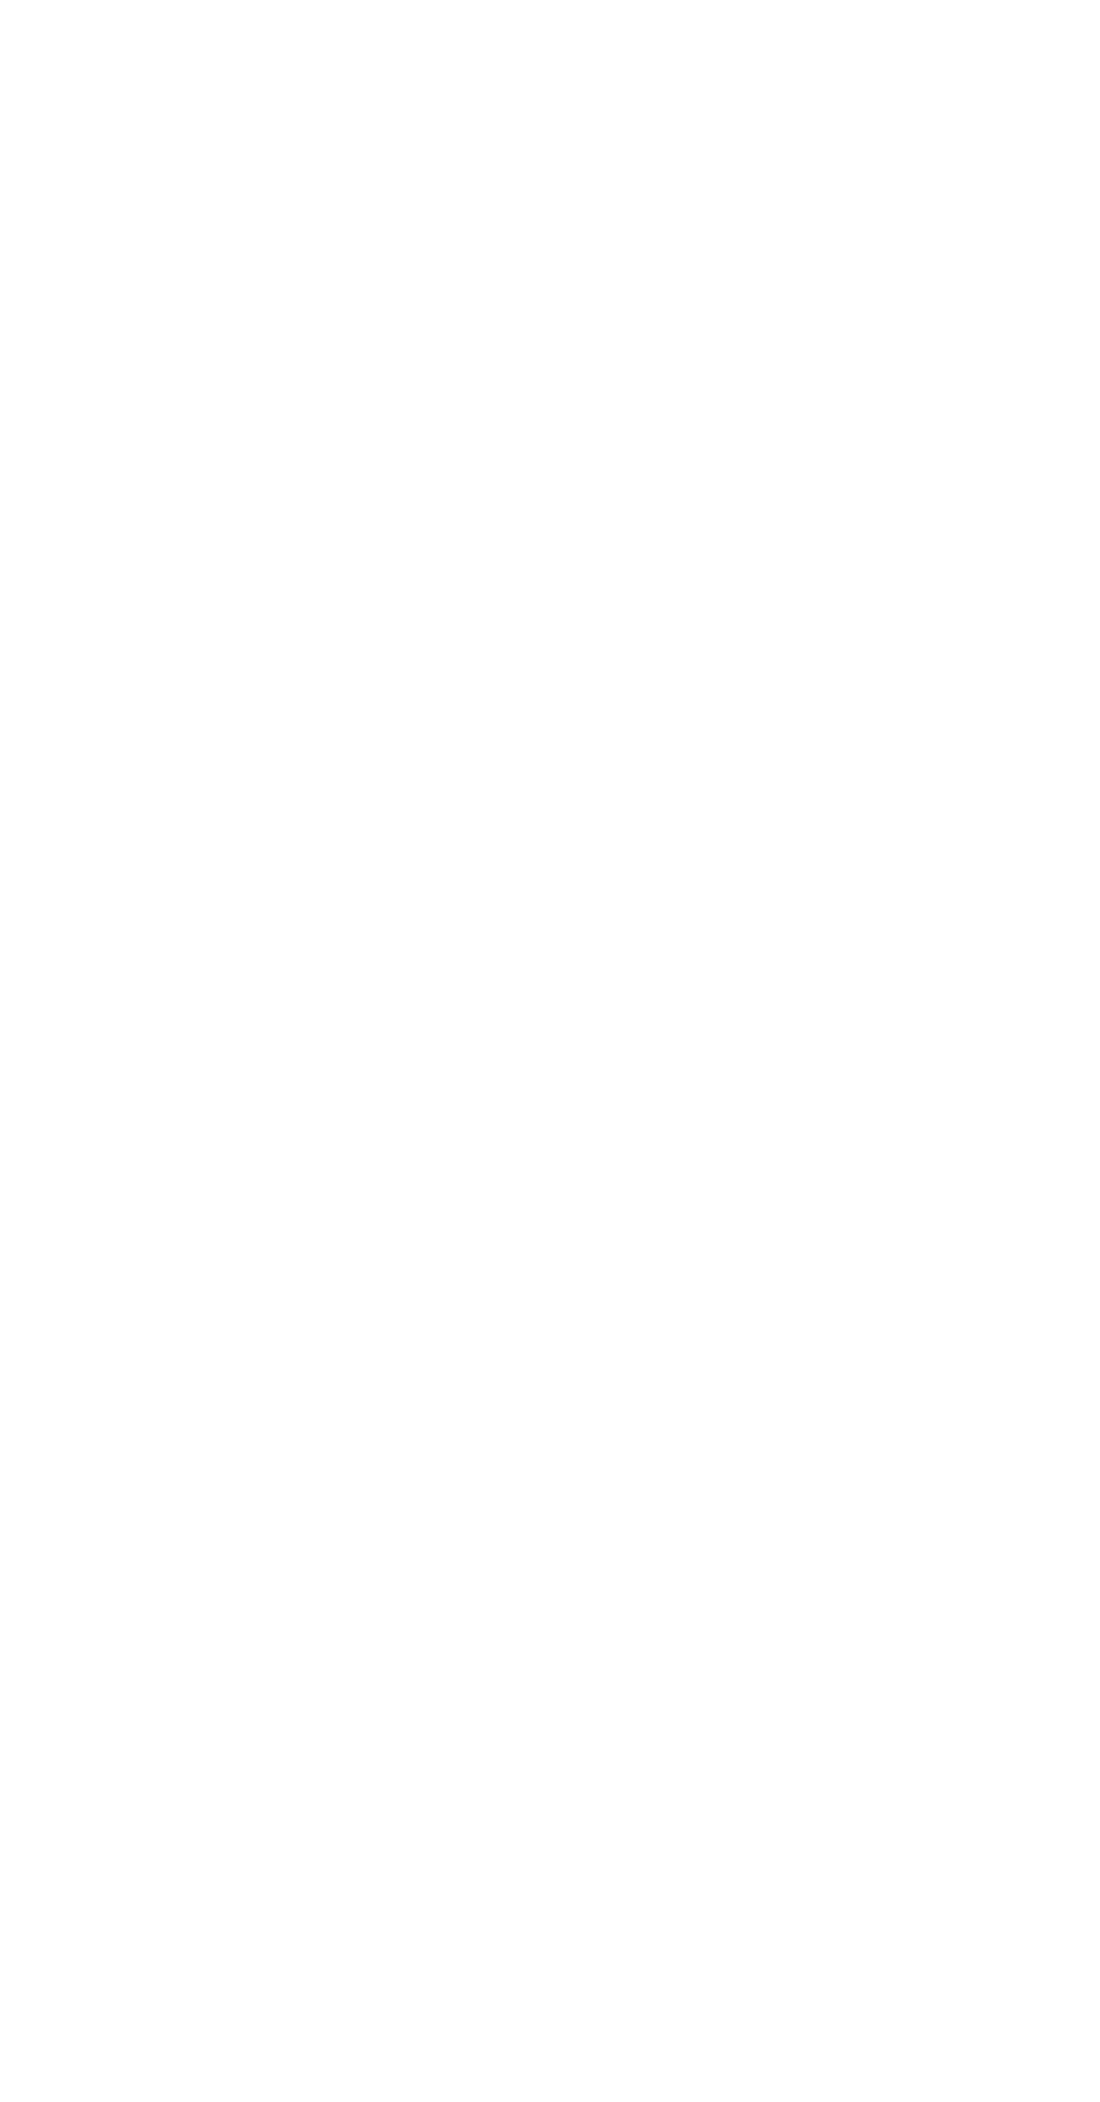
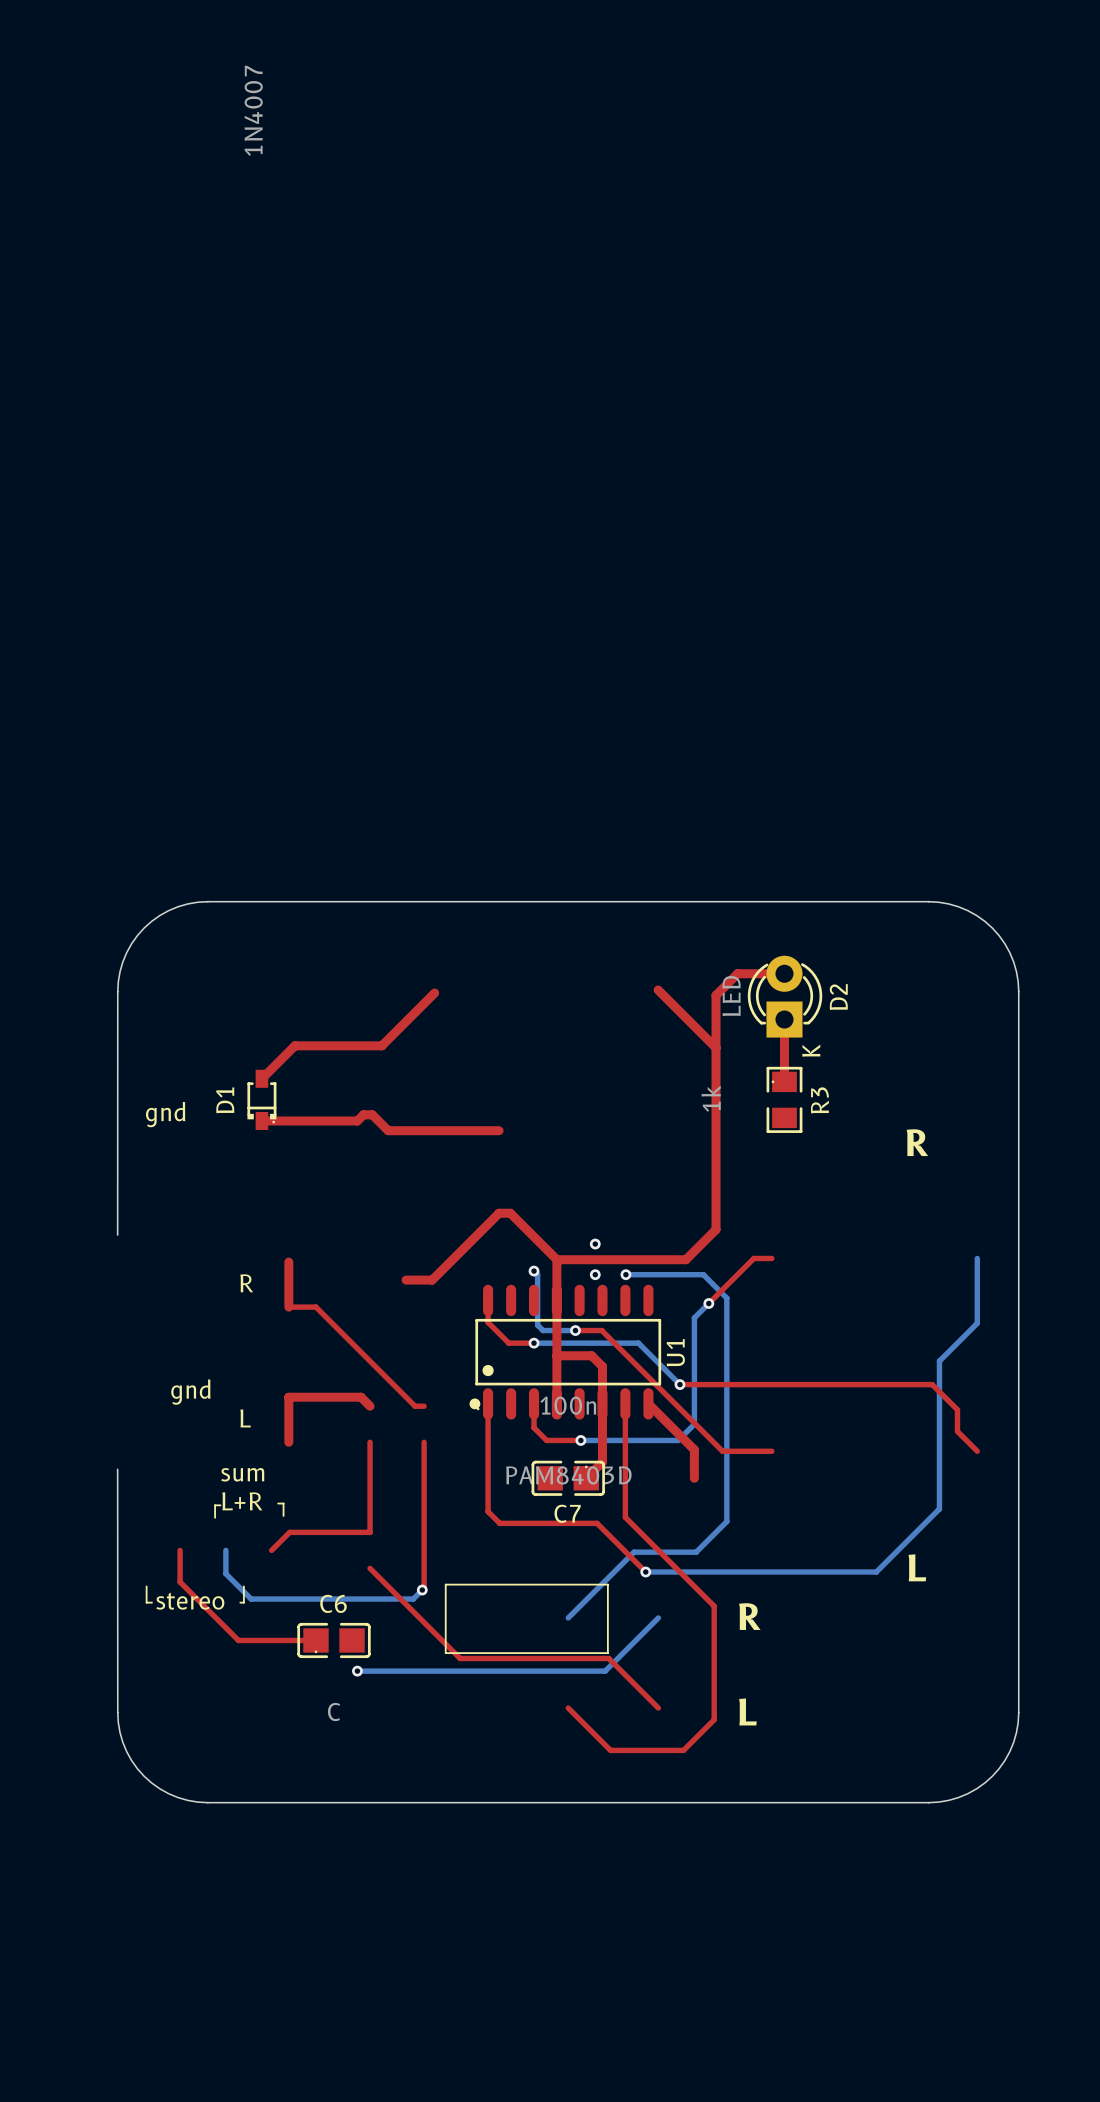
top track: none -> (784, 973) (737, 973) (716, 995) (716, 1229) (685, 1259) (556, 1259)
top track: none -> (658, 990) (716, 1047)
top track: none -> (434, 993) (381, 1045) (294, 1045) (261, 1078)
D2: none -> LED (785, 996)
top track: none -> (784, 1019) (784, 1081)
D1: none -> 1N4007 (261, 1099)
R3: none -> 1k (784, 1099)
text: none -> gnd (165, 1114)
top track: none -> (261, 1120) (357, 1120) (363, 1114) (372, 1114) (388, 1130) (499, 1130)
text: none -> R (917, 1142)
board edge: none -> (117, 1235) (117, 991) (120, 971) (126, 952) (144, 928) (159, 915) (178, 906) (207, 901) (938, 902) (967, 910) (984, 921) (999, 935) (1013, 962) (1018, 991) (1018, 1712) (1013, 1742) (1004, 1760) (992, 1776) (976, 1788) (958, 1797) (928, 1802) (207, 1802) (178, 1797) (159, 1788) (144, 1776) (126, 1751) (120, 1732) (117, 1712) (117, 1469)
via: none -> (595, 1244)
top track: none -> (771, 1258) (753, 1258) (708, 1303)
bottom track: none -> (977, 1258) (977, 1323) (939, 1361) (939, 1508) (876, 1572) (645, 1572)
top track: none -> (556, 1259) (556, 1403)
top track: none -> (556, 1259) (510, 1213) (499, 1213) (432, 1280) (406, 1280)
top track: none -> (288, 1262) (288, 1307) (315, 1307) (415, 1406) (424, 1406)
bottom track: none -> (534, 1271) (537, 1274) (537, 1325) (543, 1330) (575, 1330)
via: none -> (534, 1271)
via: none -> (595, 1274)
bottom track: none -> (625, 1274) (703, 1274) (726, 1298) (726, 1521) (696, 1552) (634, 1552) (568, 1617)
via: none -> (625, 1274)
text: none -> R (246, 1283)
top track: none -> (488, 1300) (488, 1322) (508, 1343) (534, 1343)
bottom track: none -> (708, 1303) (694, 1317) (694, 1424) (678, 1440) (580, 1440)
via: none -> (708, 1303)
top track: none -> (575, 1330) (601, 1330) (722, 1451) (771, 1451)
via: none -> (575, 1330)
bottom track: none -> (534, 1343) (638, 1343) (679, 1384)
via: none -> (534, 1343)
U1: none -> PAM8403D (565, 1352)
top track: none -> (556, 1355) (591, 1355) (602, 1366) (602, 1462) (586, 1478)
top track: none -> (679, 1384) (932, 1384) (957, 1409) (957, 1431) (977, 1451)
via: none -> (679, 1384)
text: none -> gnd (190, 1392)
top track: none -> (488, 1403) (488, 1511) (499, 1523) (597, 1523) (645, 1572)
top track: none -> (534, 1403) (534, 1427) (546, 1440) (580, 1440)
top track: none -> (625, 1403) (625, 1517) (714, 1606) (714, 1719) (683, 1750) (610, 1750) (568, 1708)
top track: none -> (648, 1403) (694, 1449) (694, 1478)
top track: none -> (370, 1406) (361, 1397) (288, 1397) (288, 1442)
text: none -> L (245, 1418)
via: none -> (580, 1440)
top track: none -> (370, 1442) (370, 1532) (289, 1532) (271, 1550)
top track: none -> (424, 1442) (424, 1588) (422, 1590)
text: none -> sum (242, 1474)
C7: none -> 100n (568, 1478)
text: none -> L+R (242, 1501)
line: none -> (278, 1503) (283, 1503) (283, 1515)
line: none -> (220, 1505) (215, 1505) (215, 1517)
top track: none -> (180, 1550) (180, 1582) (238, 1640) (315, 1640)
bottom track: none -> (225, 1550) (225, 1573) (251, 1599) (413, 1599) (422, 1590)
text: none -> L (917, 1567)
top track: none -> (370, 1568) (460, 1658) (608, 1658) (658, 1708)
via: none -> (645, 1572)
line: none -> (445, 1584) (607, 1584) (607, 1653) (445, 1653) (445, 1584)
line: none -> (146, 1586) (146, 1602) (152, 1602)
line: none -> (243, 1586) (243, 1602) (240, 1602)
via: none -> (422, 1590)
text: none -> stereo (190, 1601)
text: none -> R (749, 1616)
bottom track: none -> (658, 1617) (605, 1671) (357, 1671)
C6: none -> C (334, 1640)
via: none -> (357, 1671)
text: none -> L (747, 1711)

